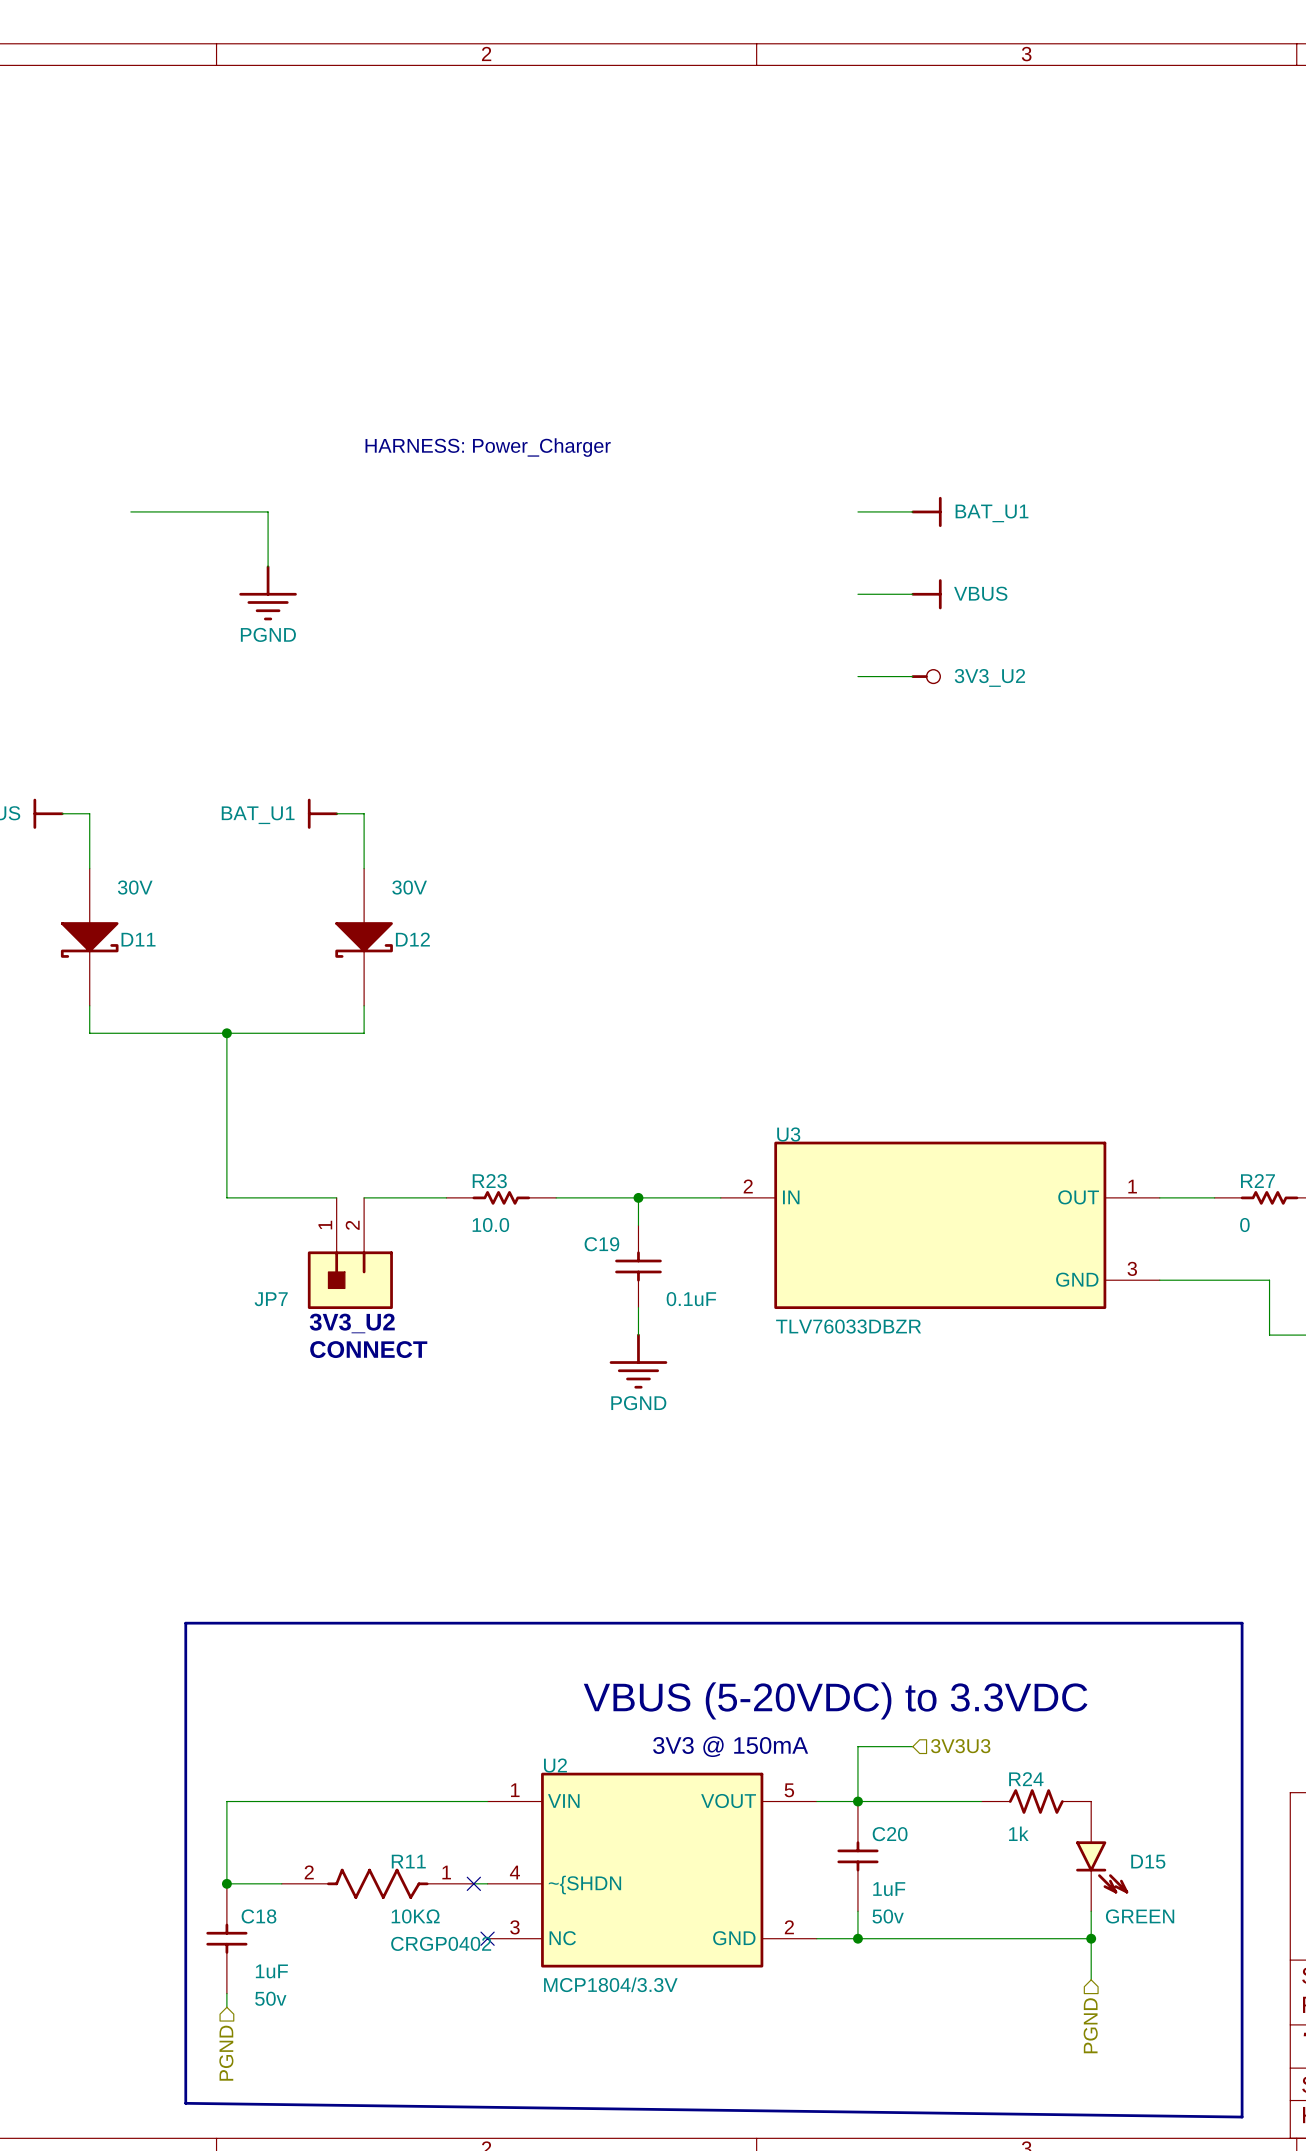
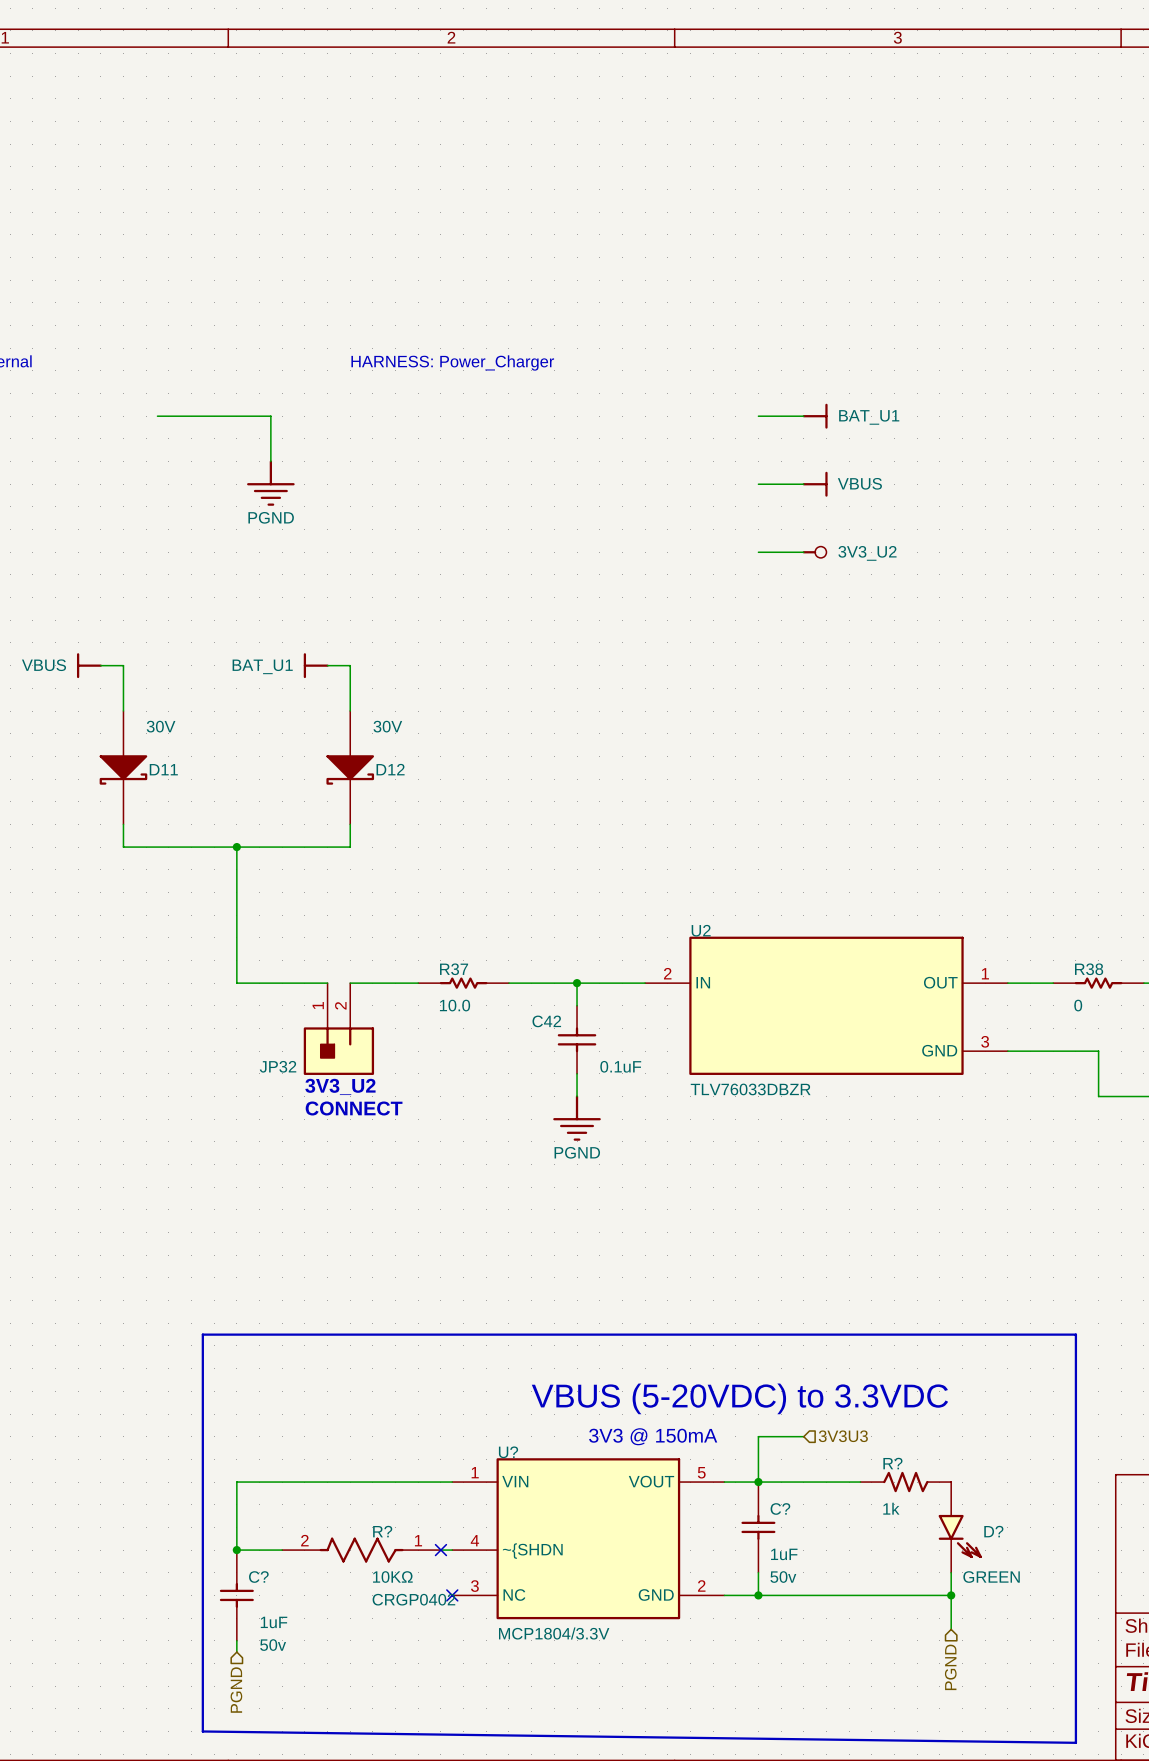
U3 name: U3 (788, 1134) -> U2 (701, 930)
R23 name: R23 (489, 1181) -> R37 (454, 969)
R27 name: R27 (1257, 1181) -> R38 (1089, 969)
C19 name: C19 (601, 1244) -> C42 (546, 1021)
JP7 name: JP7 (271, 1299) -> JP32 (278, 1066)
U2 name: U2 (555, 1765) -> U? (508, 1452)
R24 name: R24 (1026, 1779) -> R? (892, 1463)
C20 name: C20 (890, 1834) -> C? (780, 1508)
R11 name: R11 (408, 1861) -> R? (382, 1531)
D15 name: D15 (1148, 1861) -> D? (993, 1531)
C18 name: C18 (258, 1916) -> C? (258, 1577)

